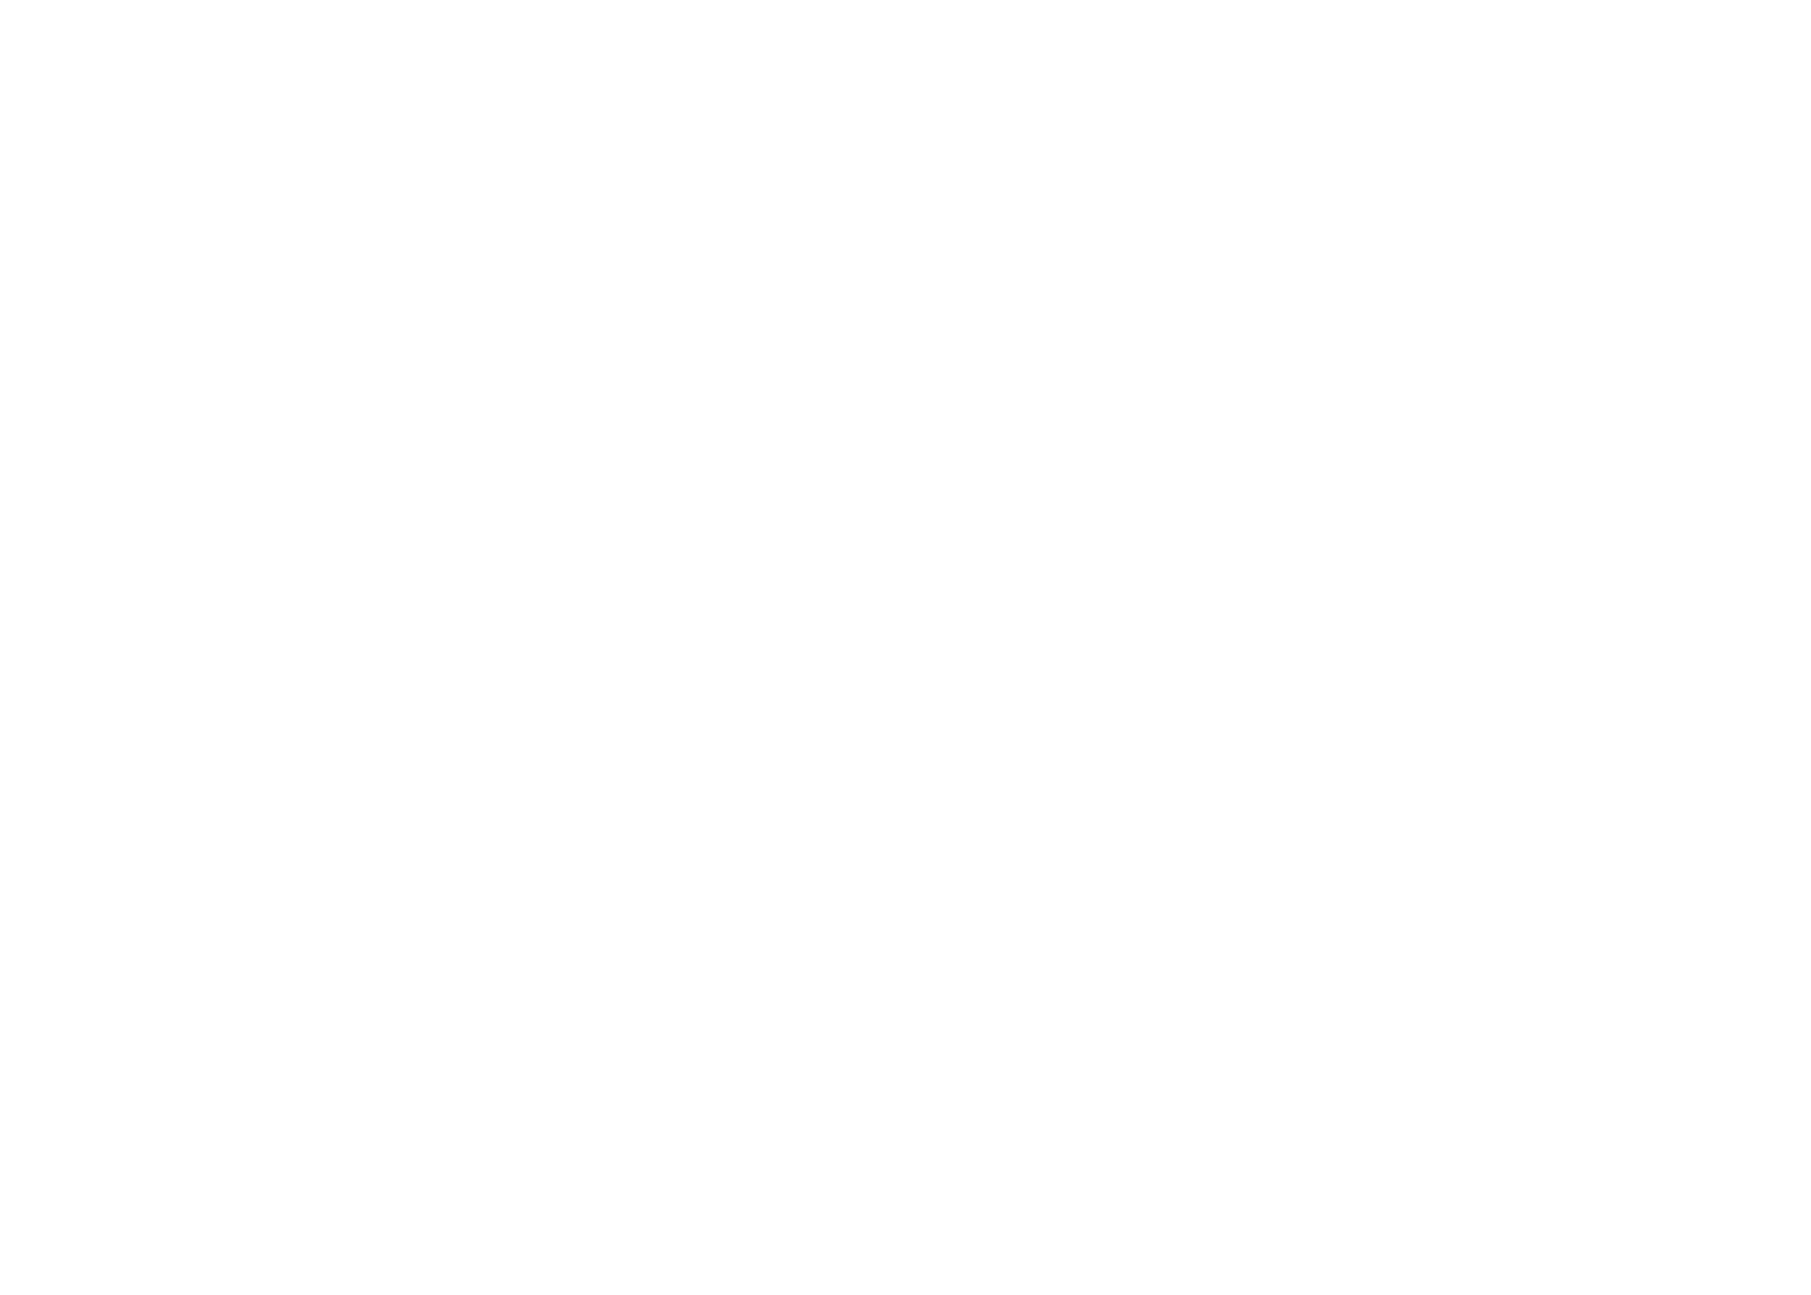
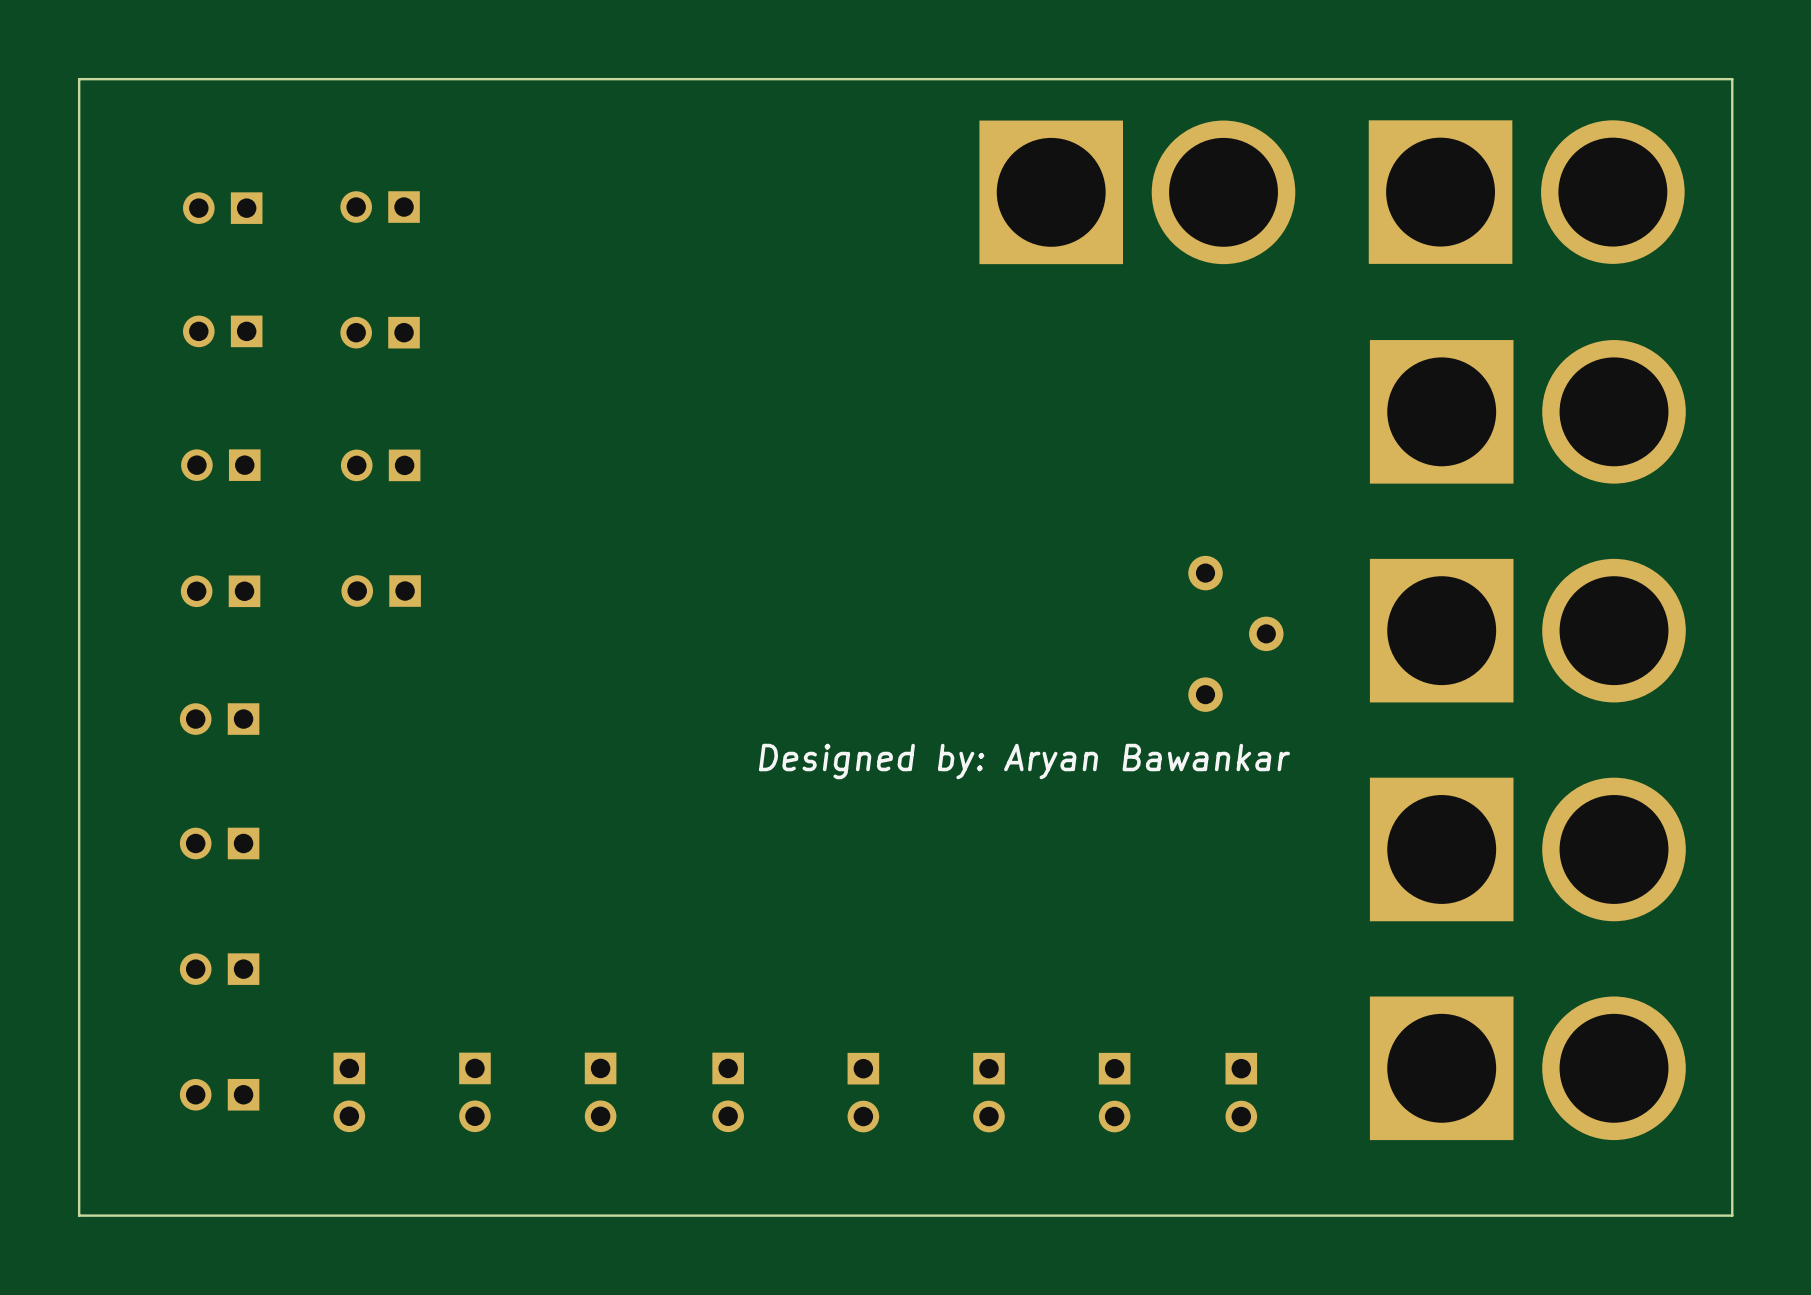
board edge: none -> (1732, 79) (79, 79) (79, 1215) (1732, 1215) (1732, 79)
part: none -> (1137, 192)
part: none -> (1526, 192)
part: none -> (380, 207)
part: none -> (222, 208)
part: none -> (222, 331)
part: none -> (380, 332)
part: none -> (1527, 411)
part: none -> (220, 465)
part: none -> (380, 465)
part: none -> (220, 591)
part: none -> (381, 591)
part: none -> (1527, 630)
part: none -> (1235, 633)
part: none -> (219, 719)
text: none -> Designed by: Aryan Bawankar (1024, 761)
part: none -> (219, 843)
part: none -> (1527, 849)
part: none -> (219, 969)
part: none -> (1527, 1068)
part: none -> (349, 1092)
part: none -> (474, 1092)
part: none -> (600, 1092)
part: none -> (728, 1092)
part: none -> (863, 1092)
part: none -> (988, 1092)
part: none -> (1114, 1092)
part: none -> (1241, 1092)
part: none -> (219, 1094)

